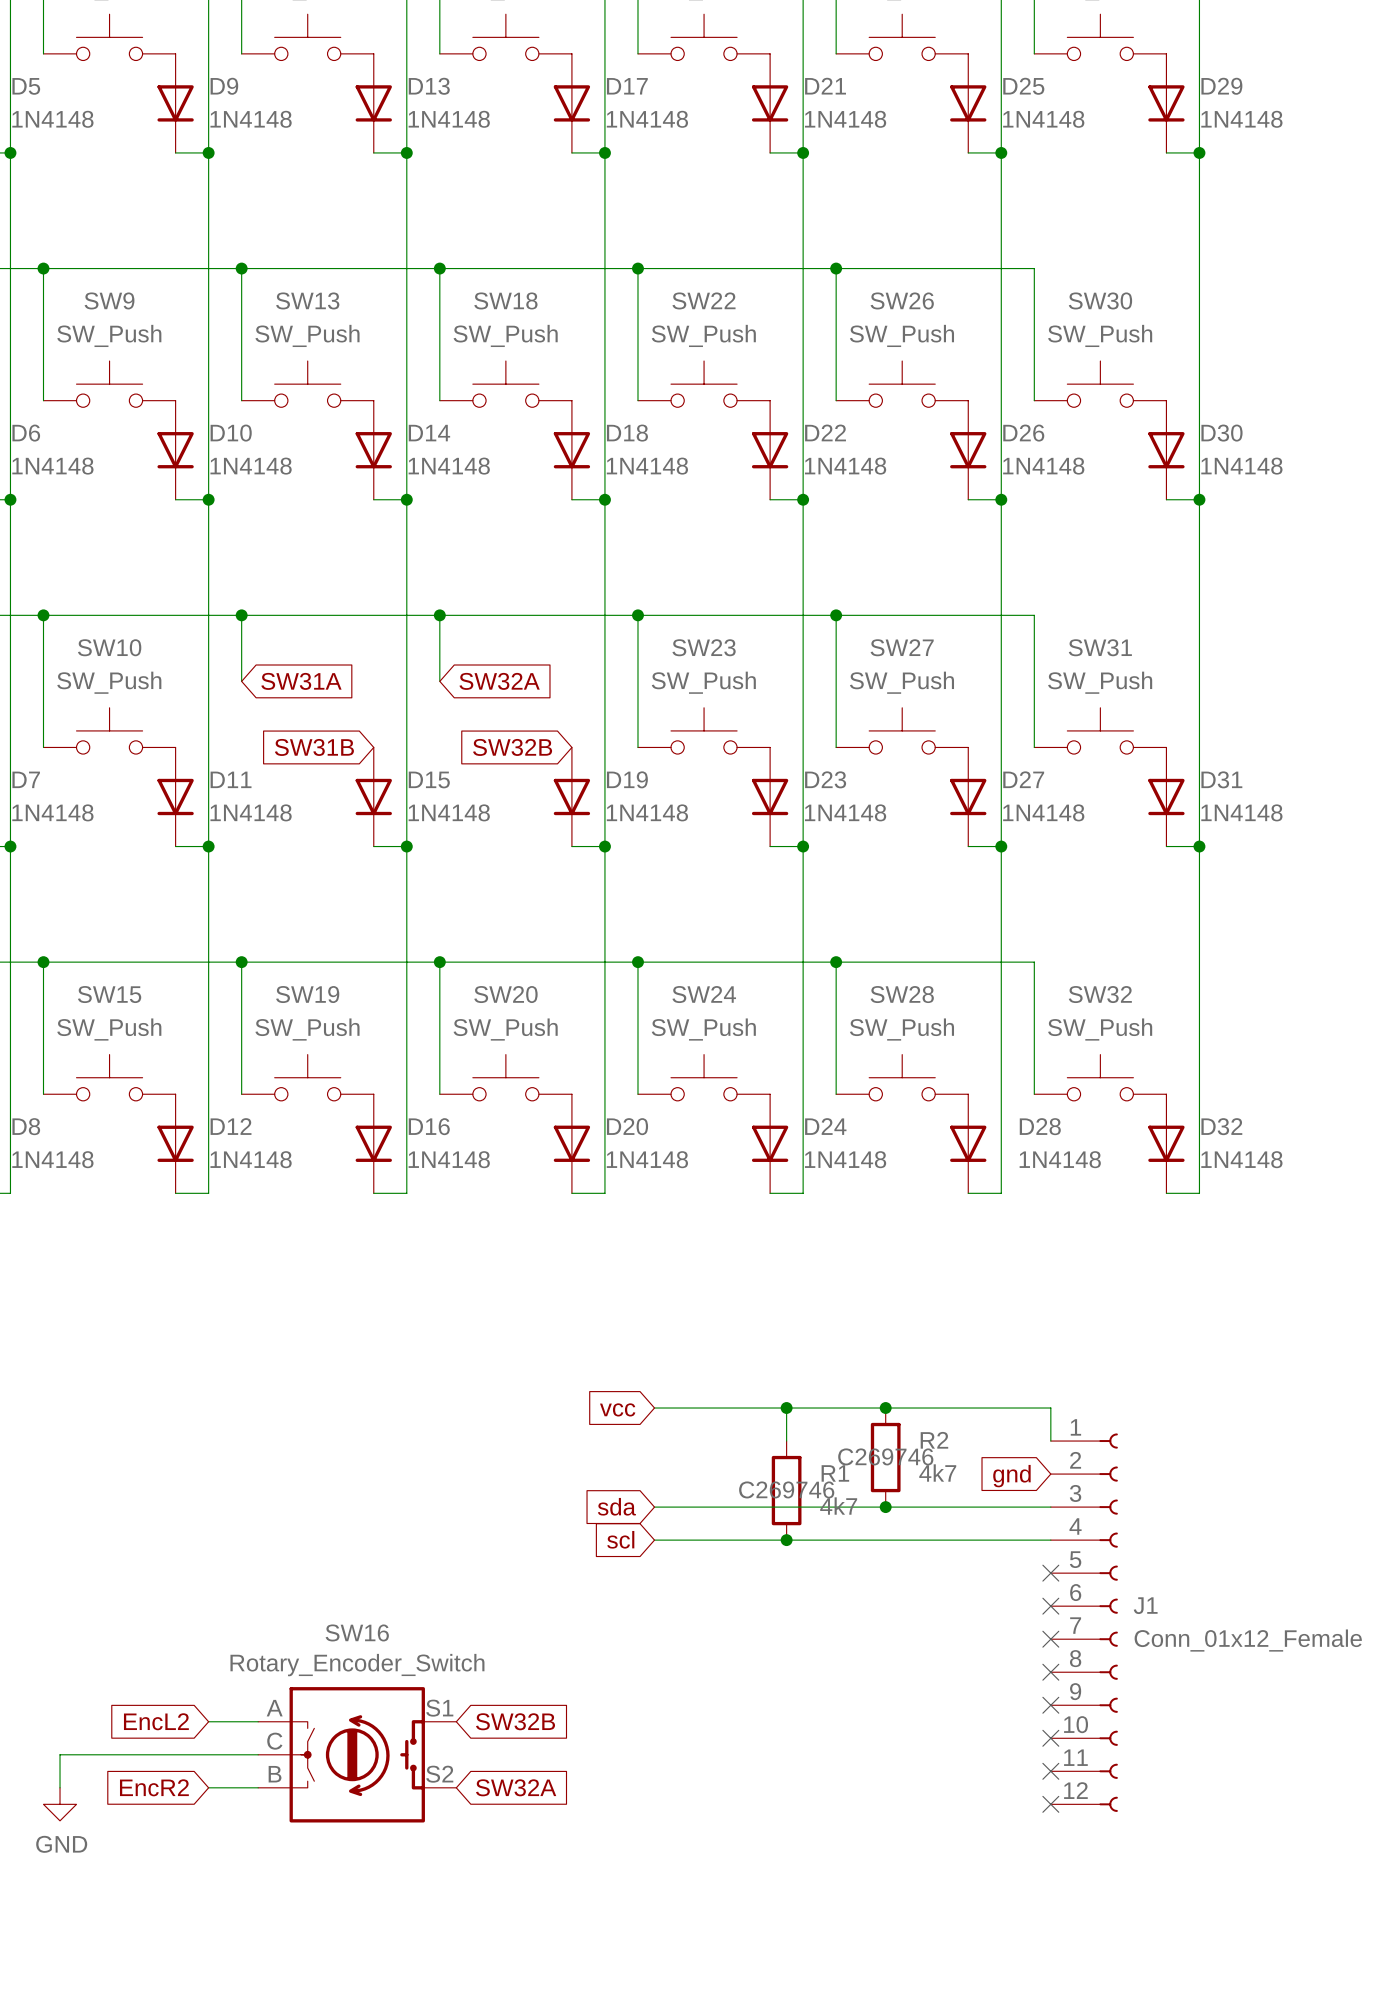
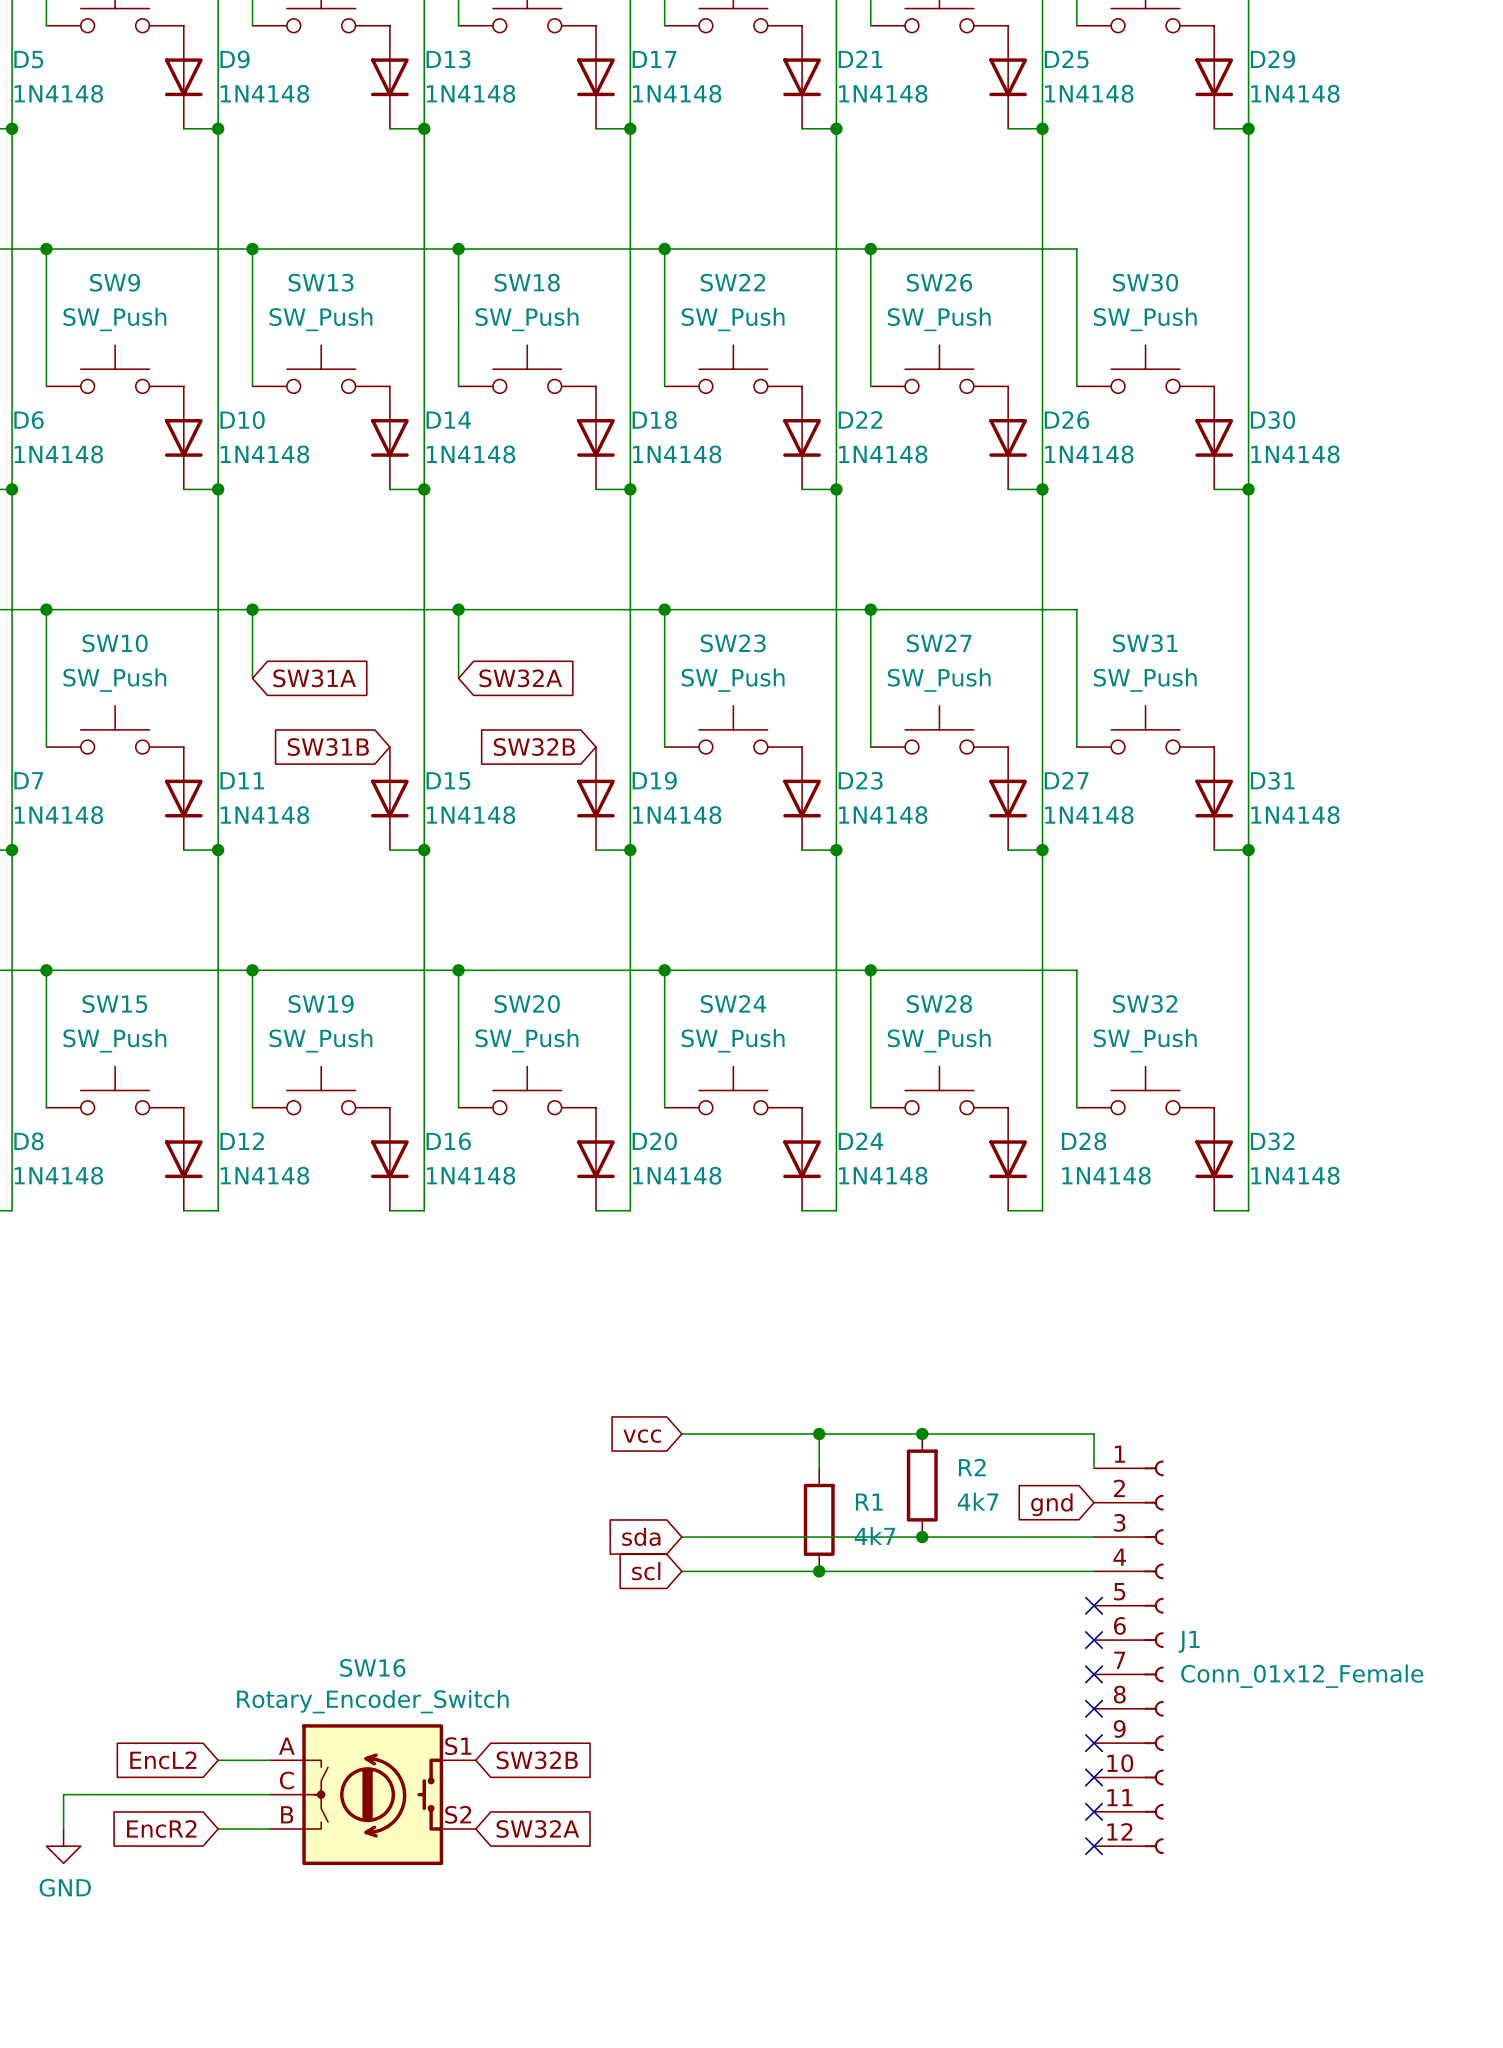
R2 text: C269746 (885, 1456) -> none
R1 text: C269746 (786, 1489) -> none

